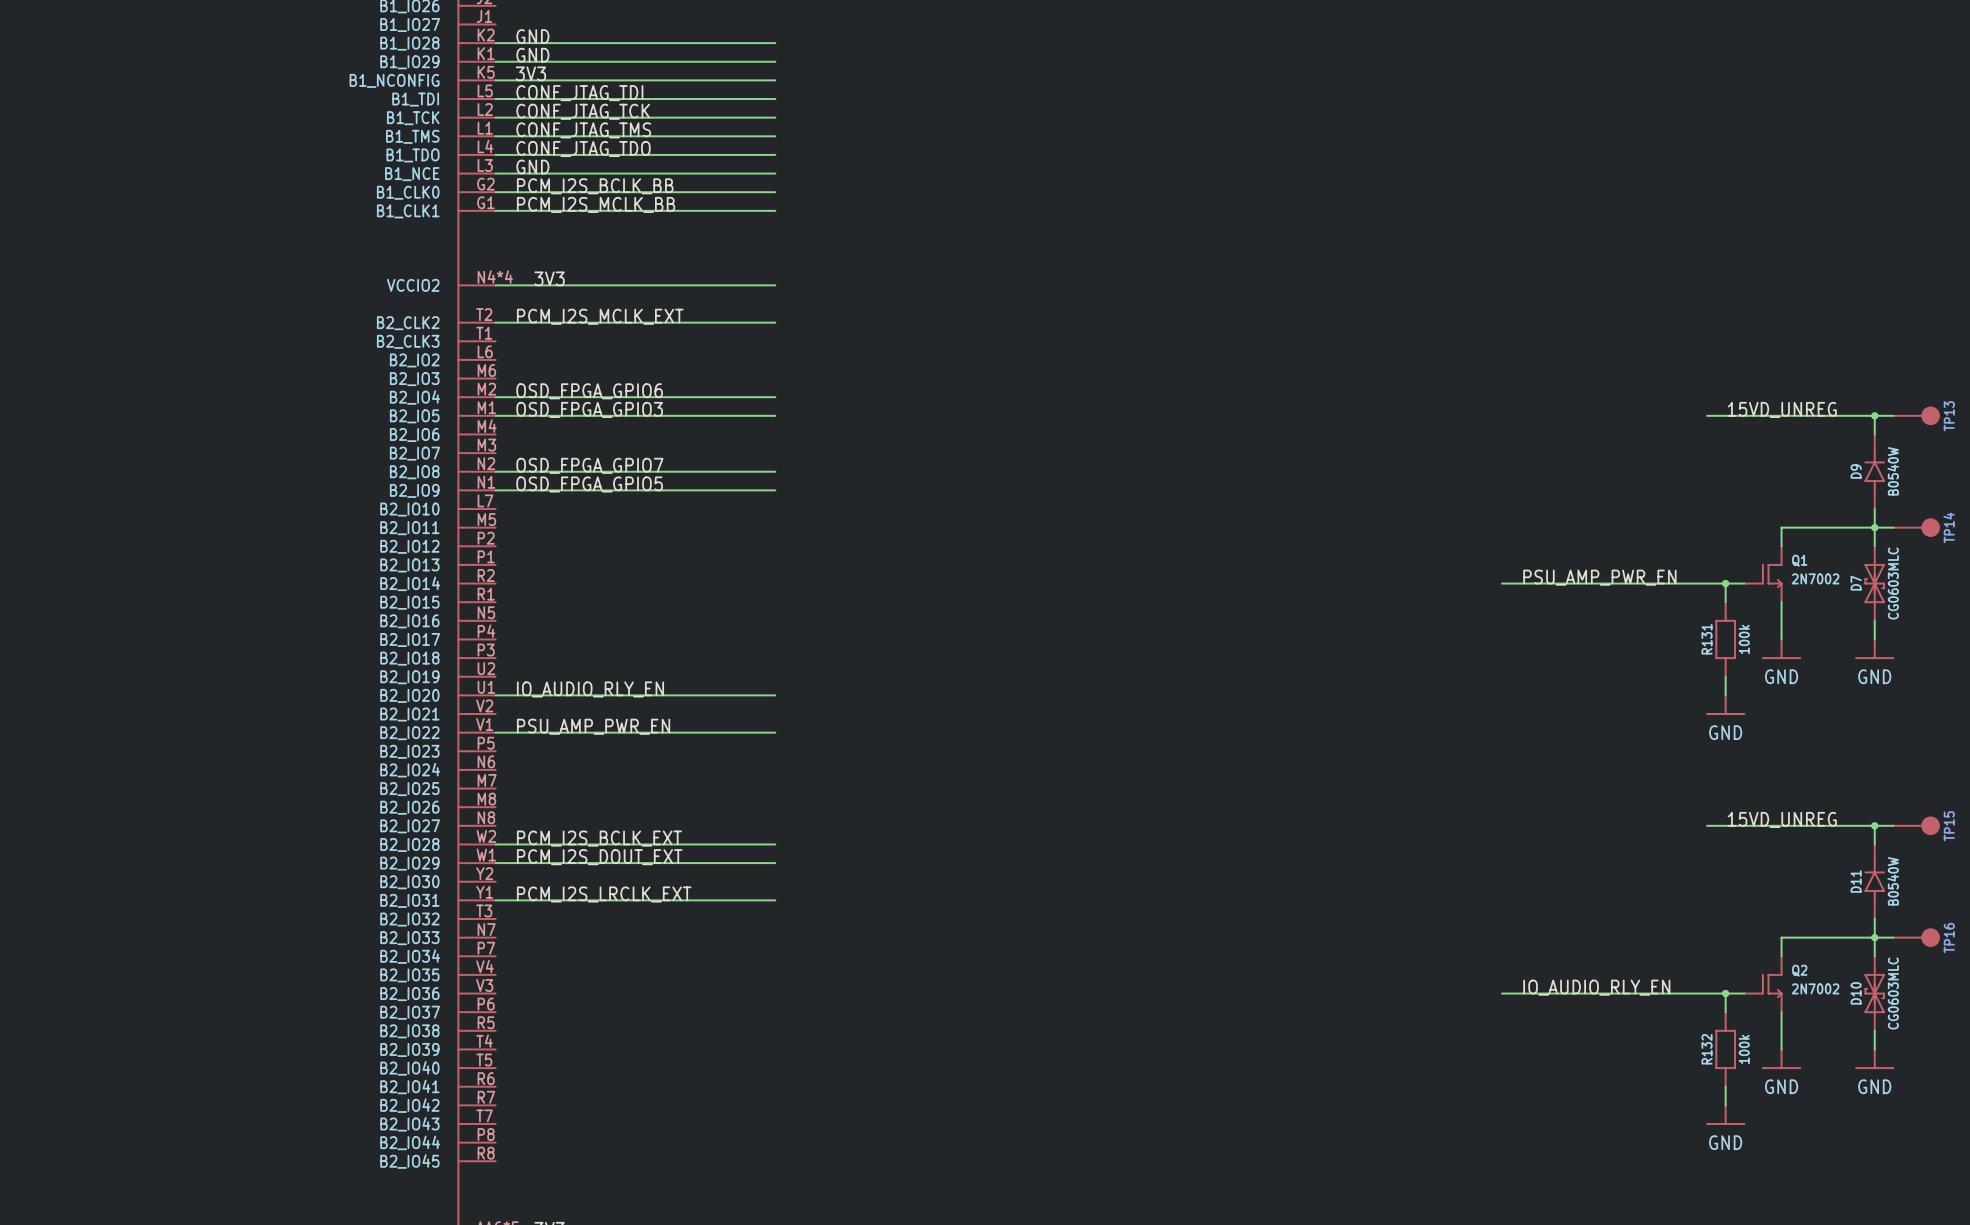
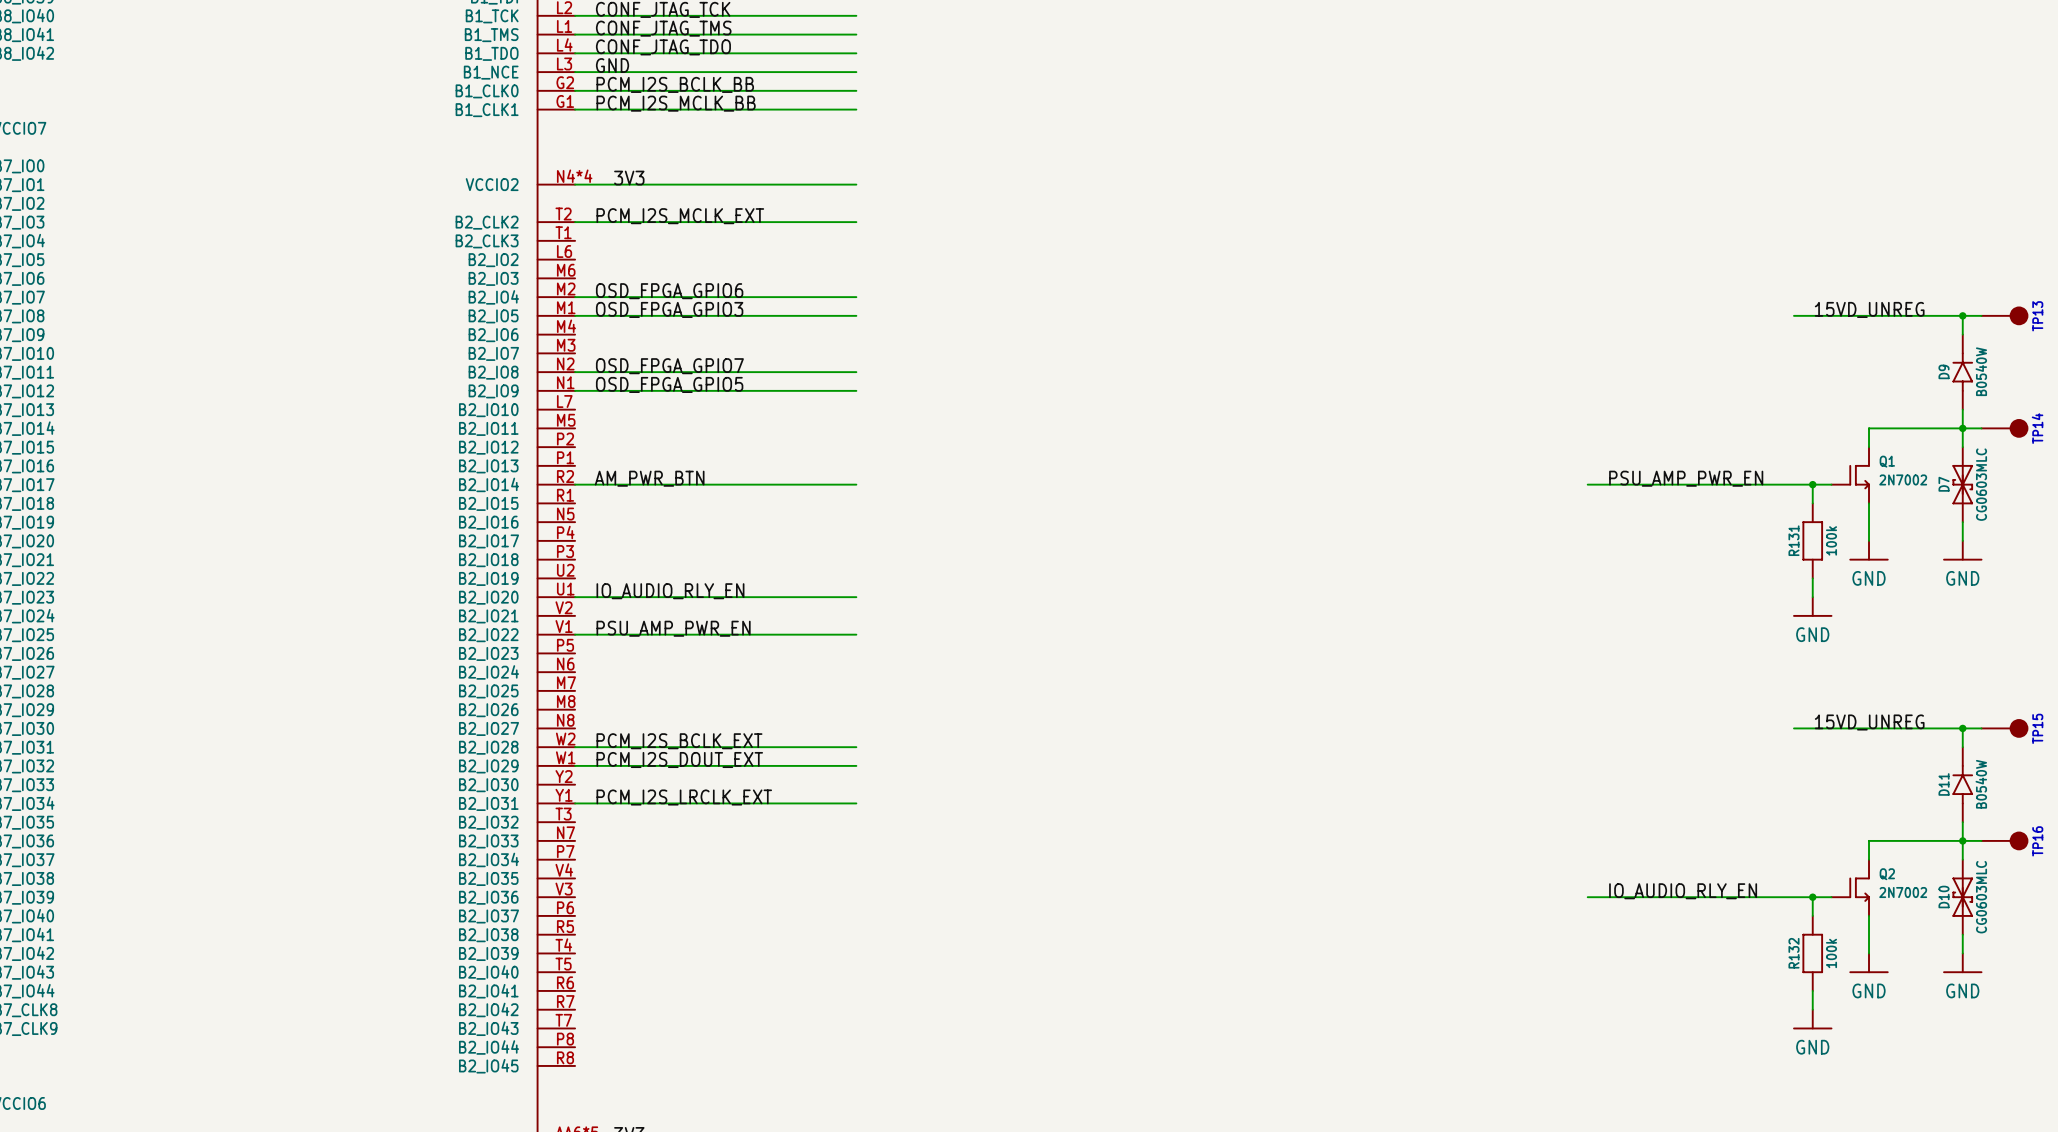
label: none -> AM_PWR_BTN (649, 478)
wire: none -> (575, 484) (856, 484)

